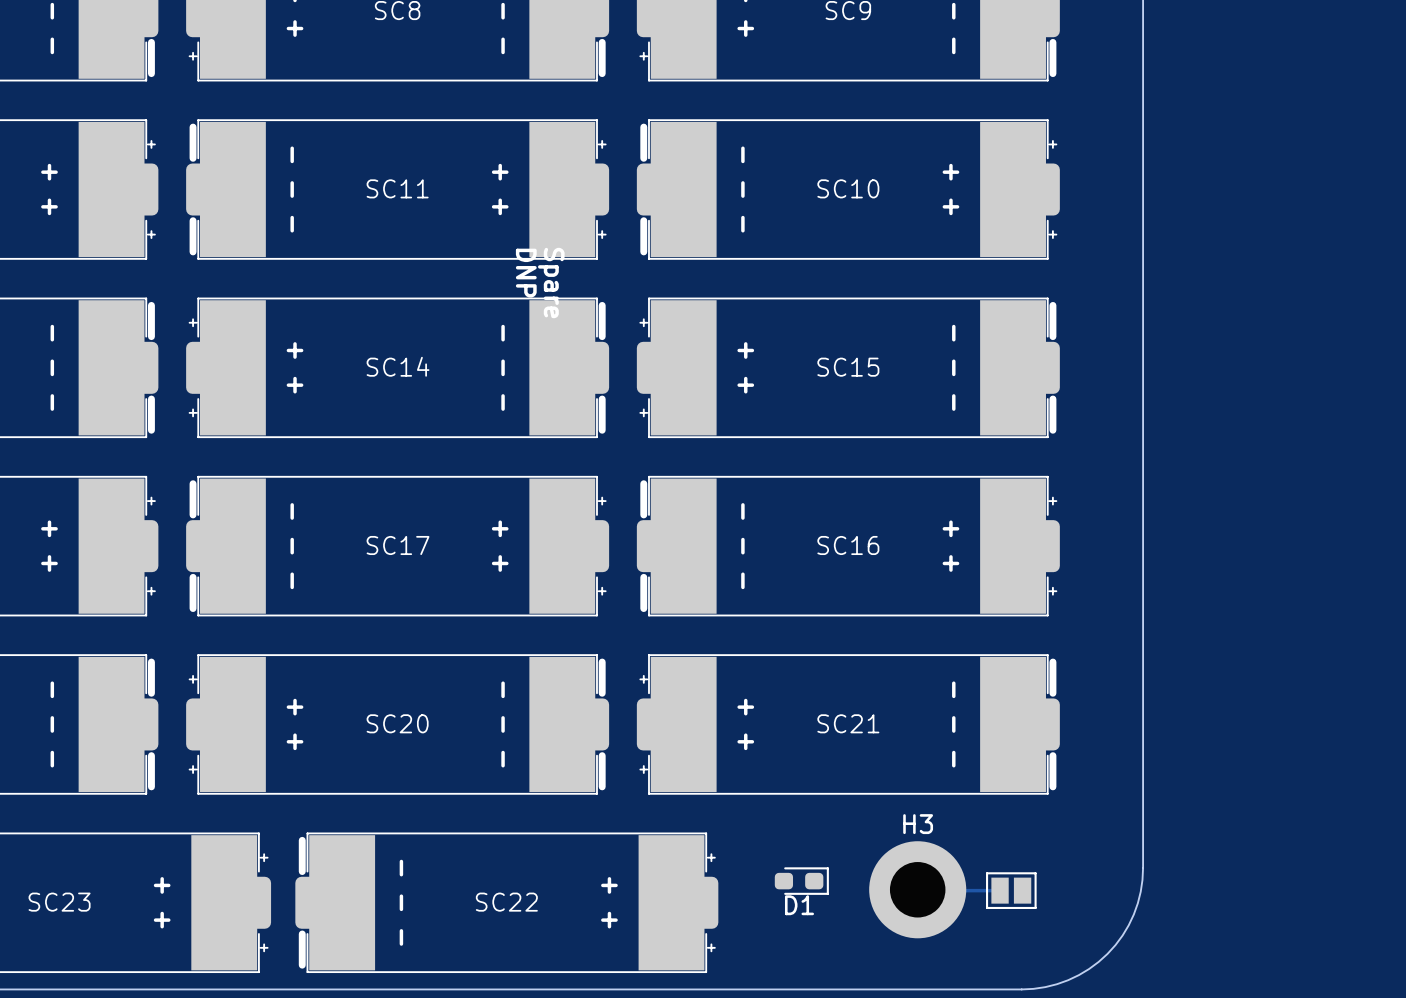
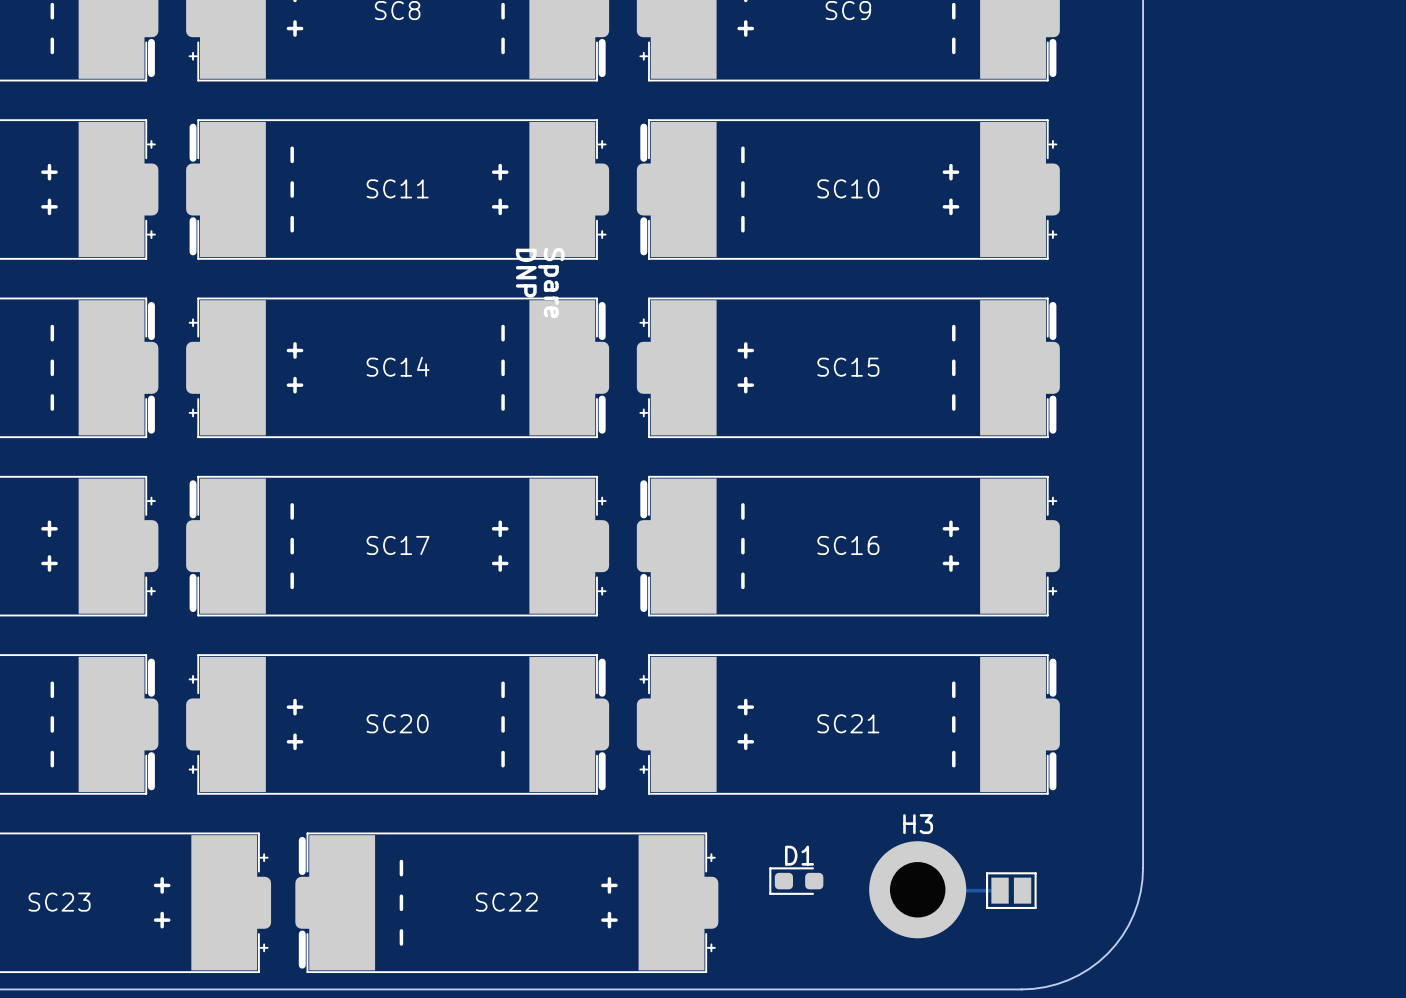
D1 rotation: 0° (801, 881) -> 180° (796, 881)

